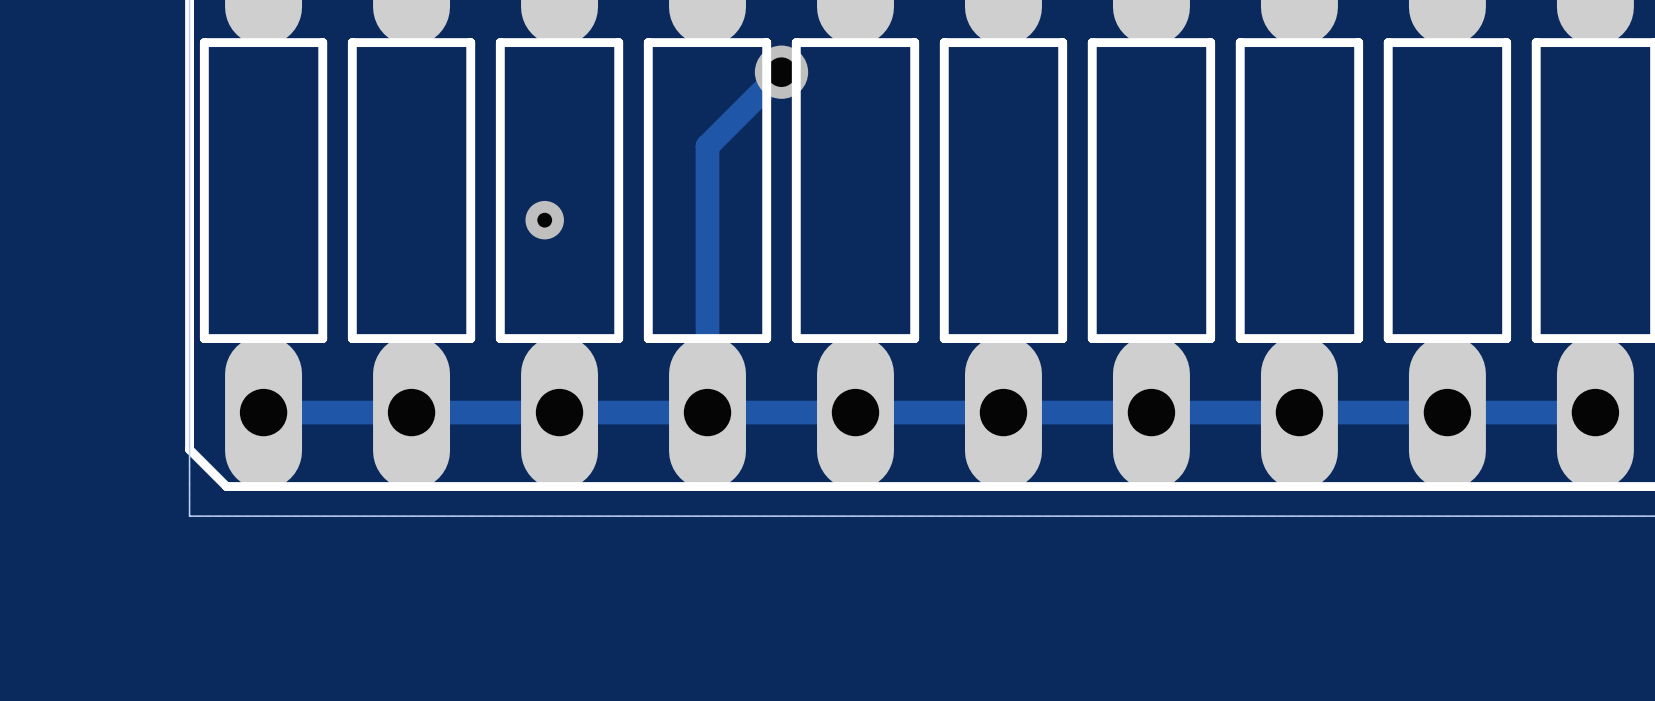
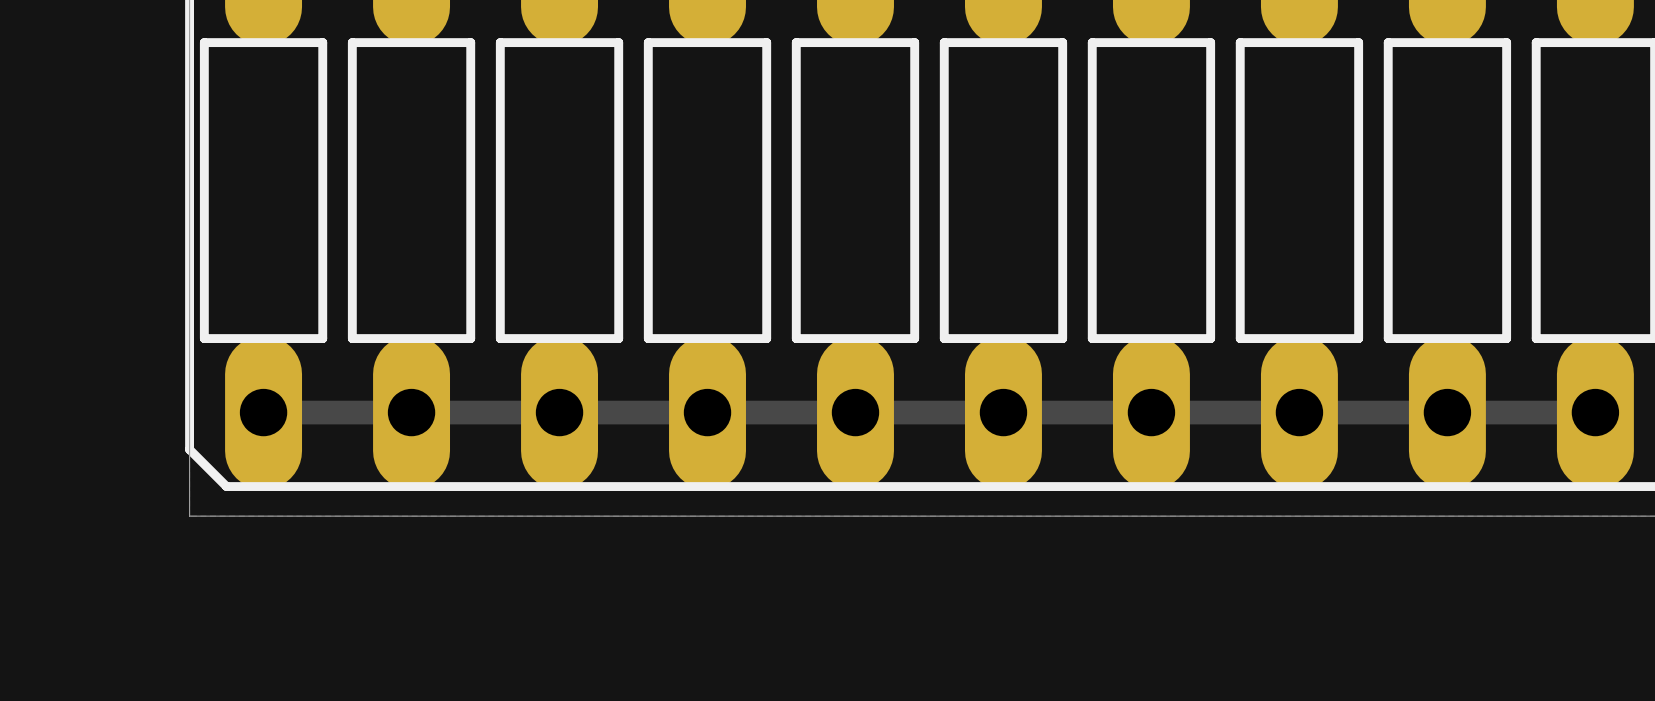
track: (781, 72) (707, 146) (707, 412) -> none
via: (781, 72) -> none
via: (544, 220) -> none

